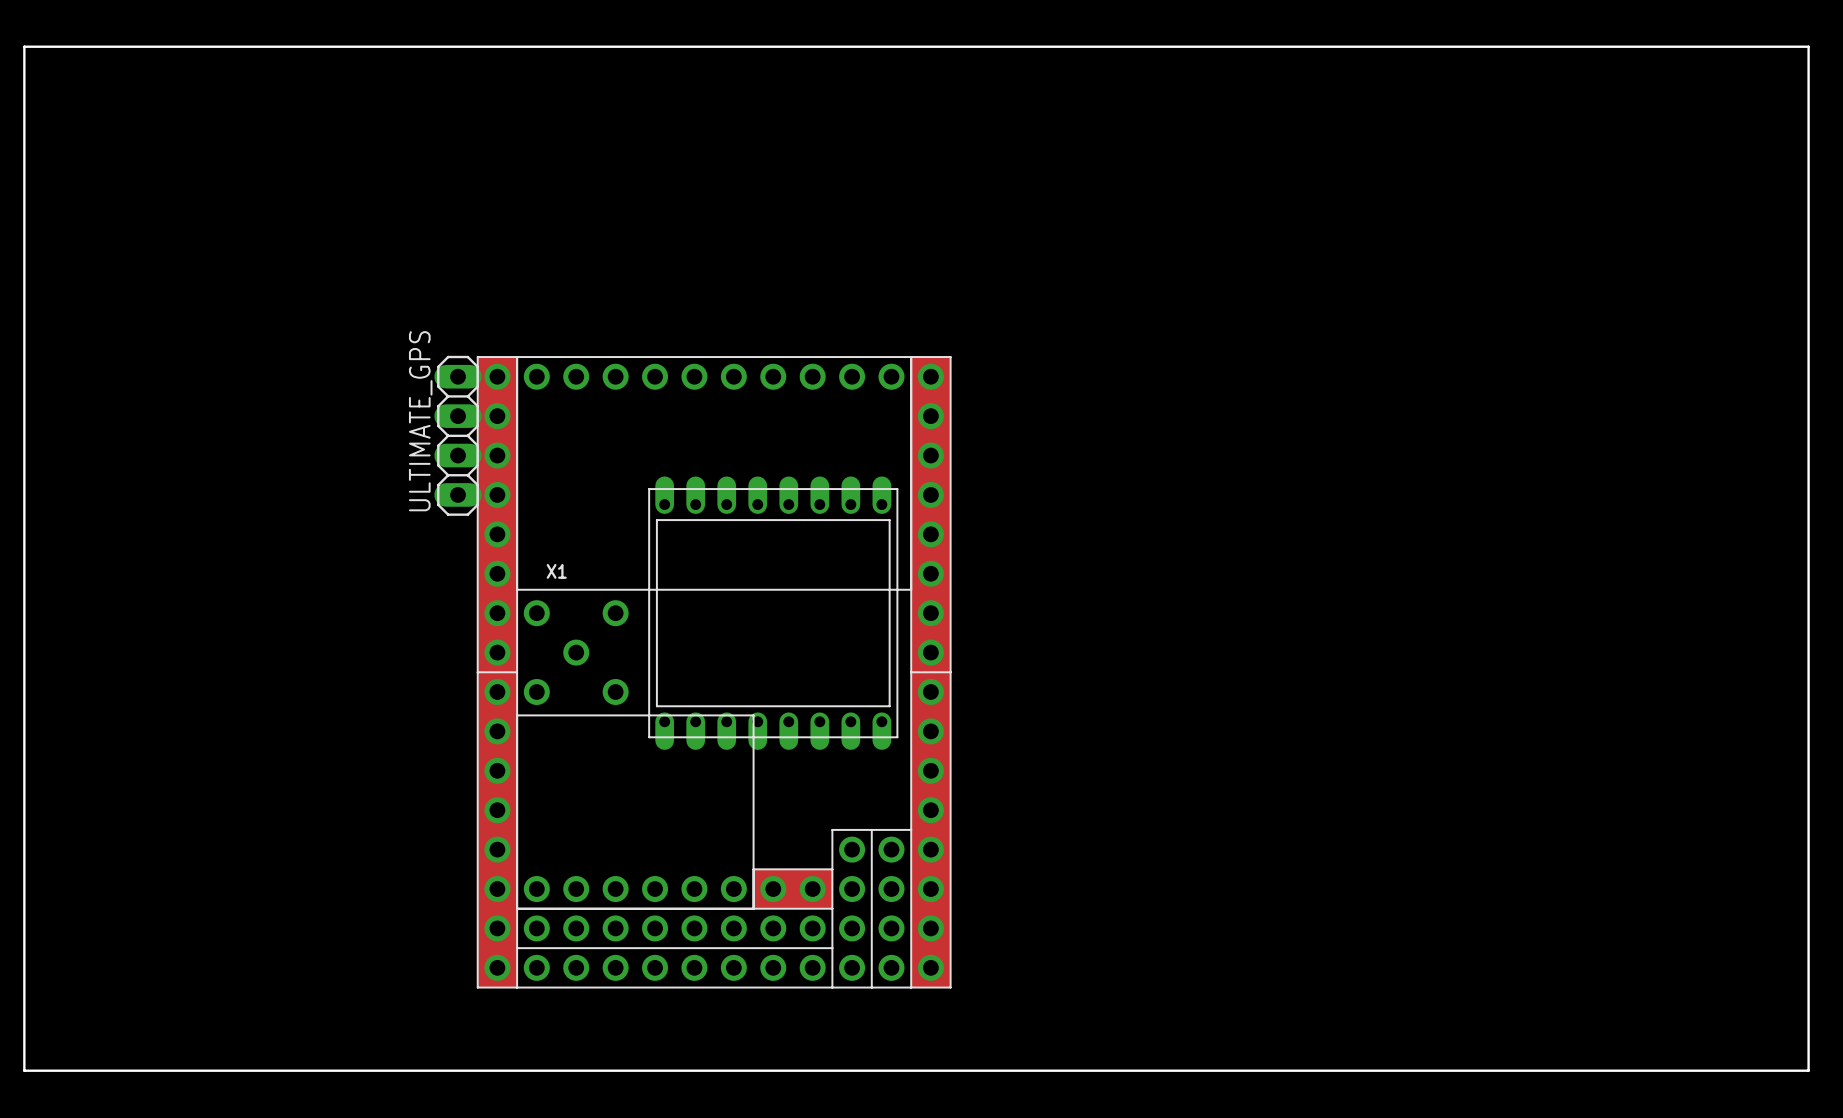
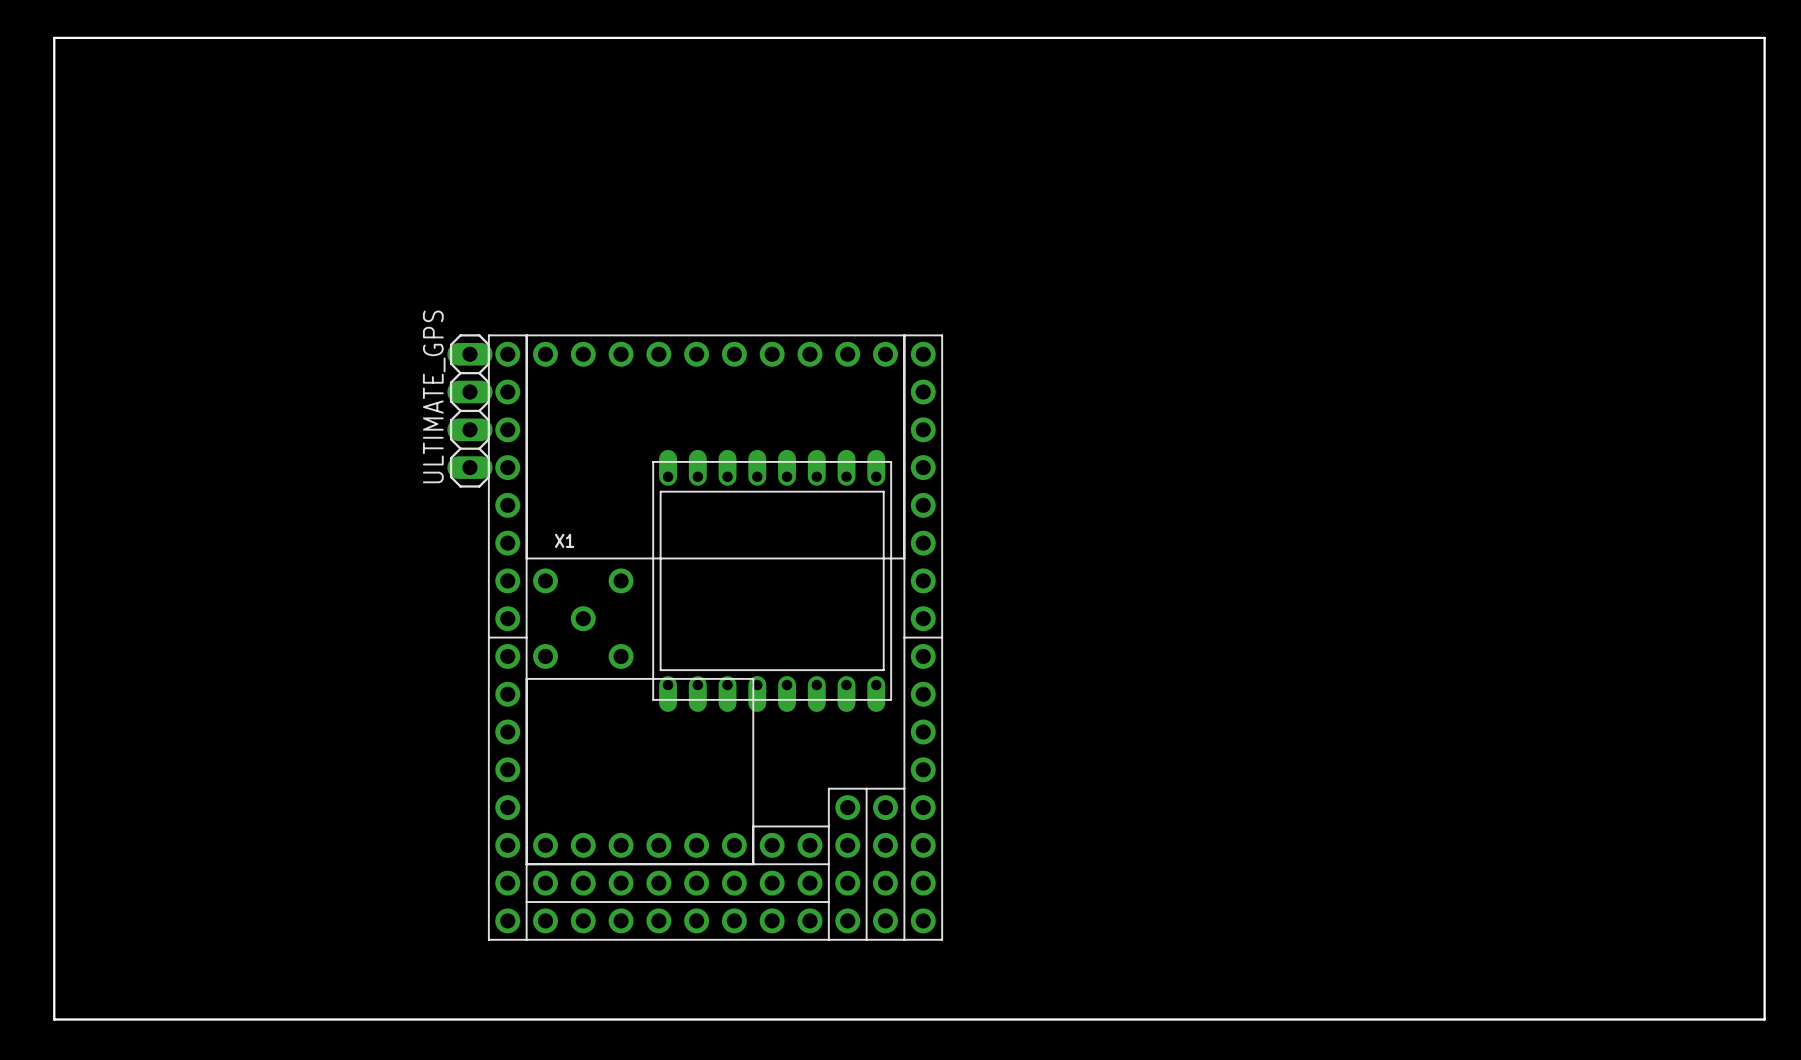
drawing: [477, 357, 518, 988] -> none
drawing: [911, 357, 951, 988] -> none
drawing: [753, 869, 833, 909] -> none

